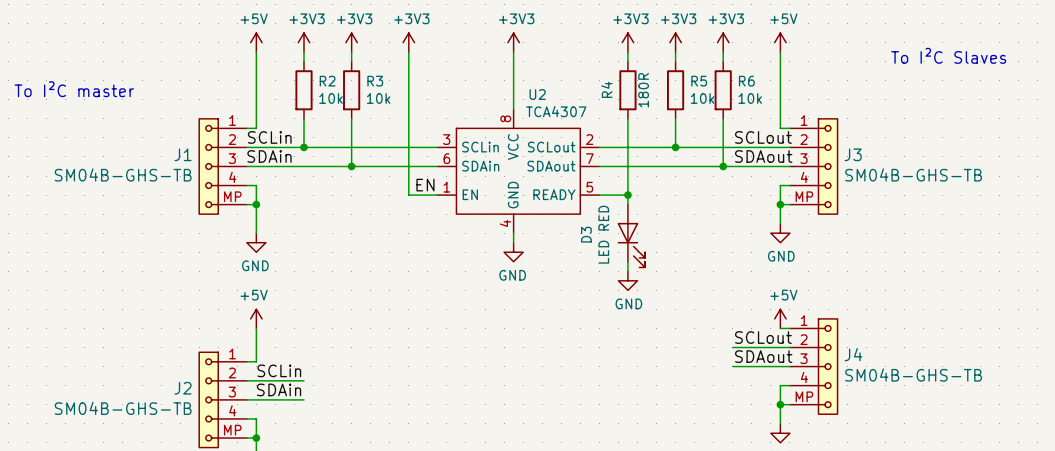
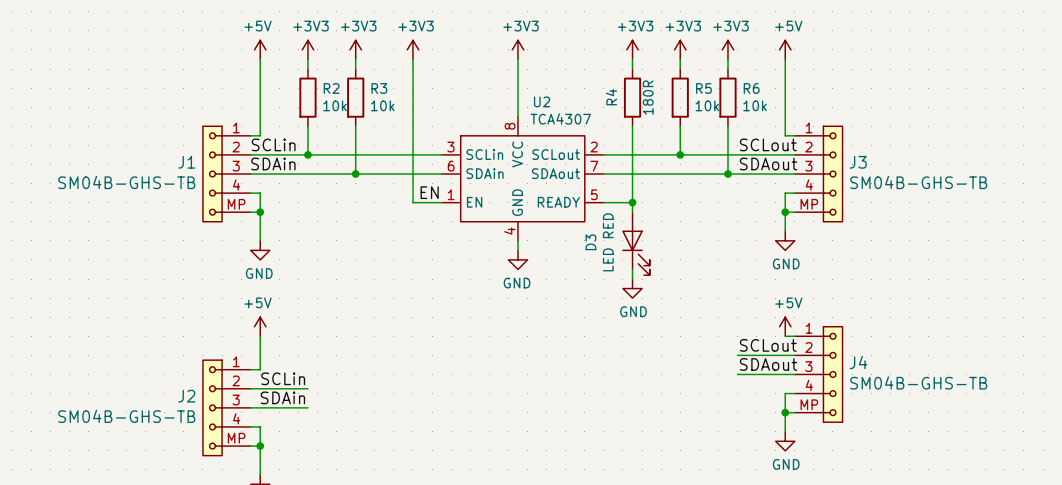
text: To I²C Slaves (948, 55) -> none
text: To I²C master (74, 89) -> none

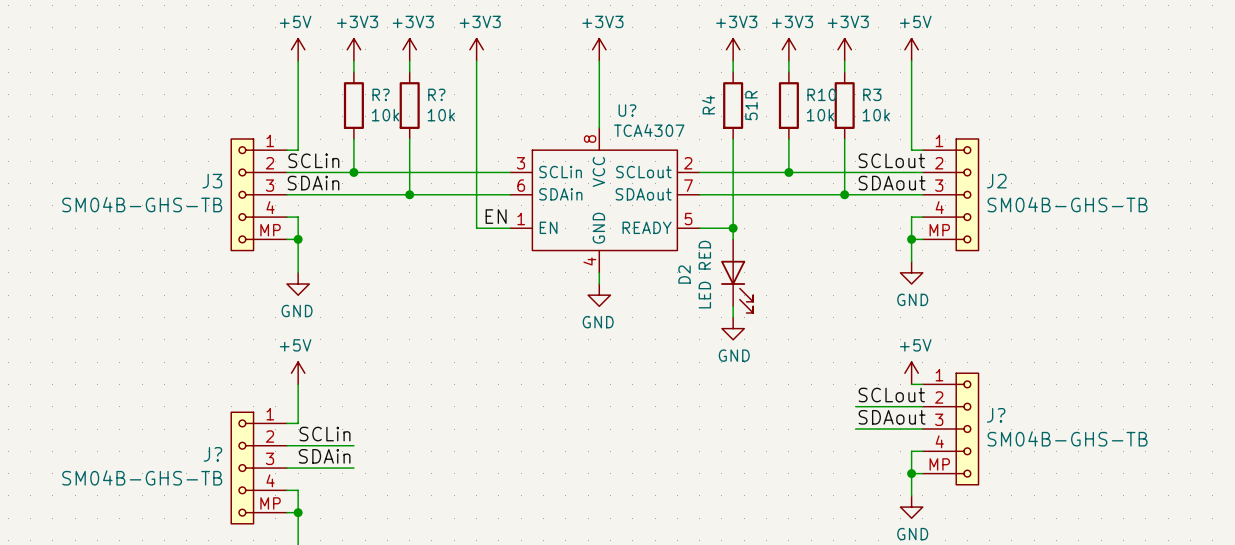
R2 name: R2 (331, 88) -> R? (381, 94)
R3 name: R3 (379, 88) -> R? (436, 94)
R5 name: R5 (703, 88) -> R10 (821, 94)
R6 name: R6 (751, 88) -> R3 (872, 94)
R4 value: 180R (648, 97) -> 51R (751, 105)
U2 name: U2 (542, 101) -> U? (627, 110)
J1 name: J1 (186, 162) -> J3 (212, 181)
J3 name: J3 (858, 162) -> J2 (996, 181)
D3 name: D3 (590, 242) -> D2 (684, 274)
J4 name: J4 (858, 362) -> J? (996, 415)
J2 name: J2 (186, 396) -> J? (212, 454)

